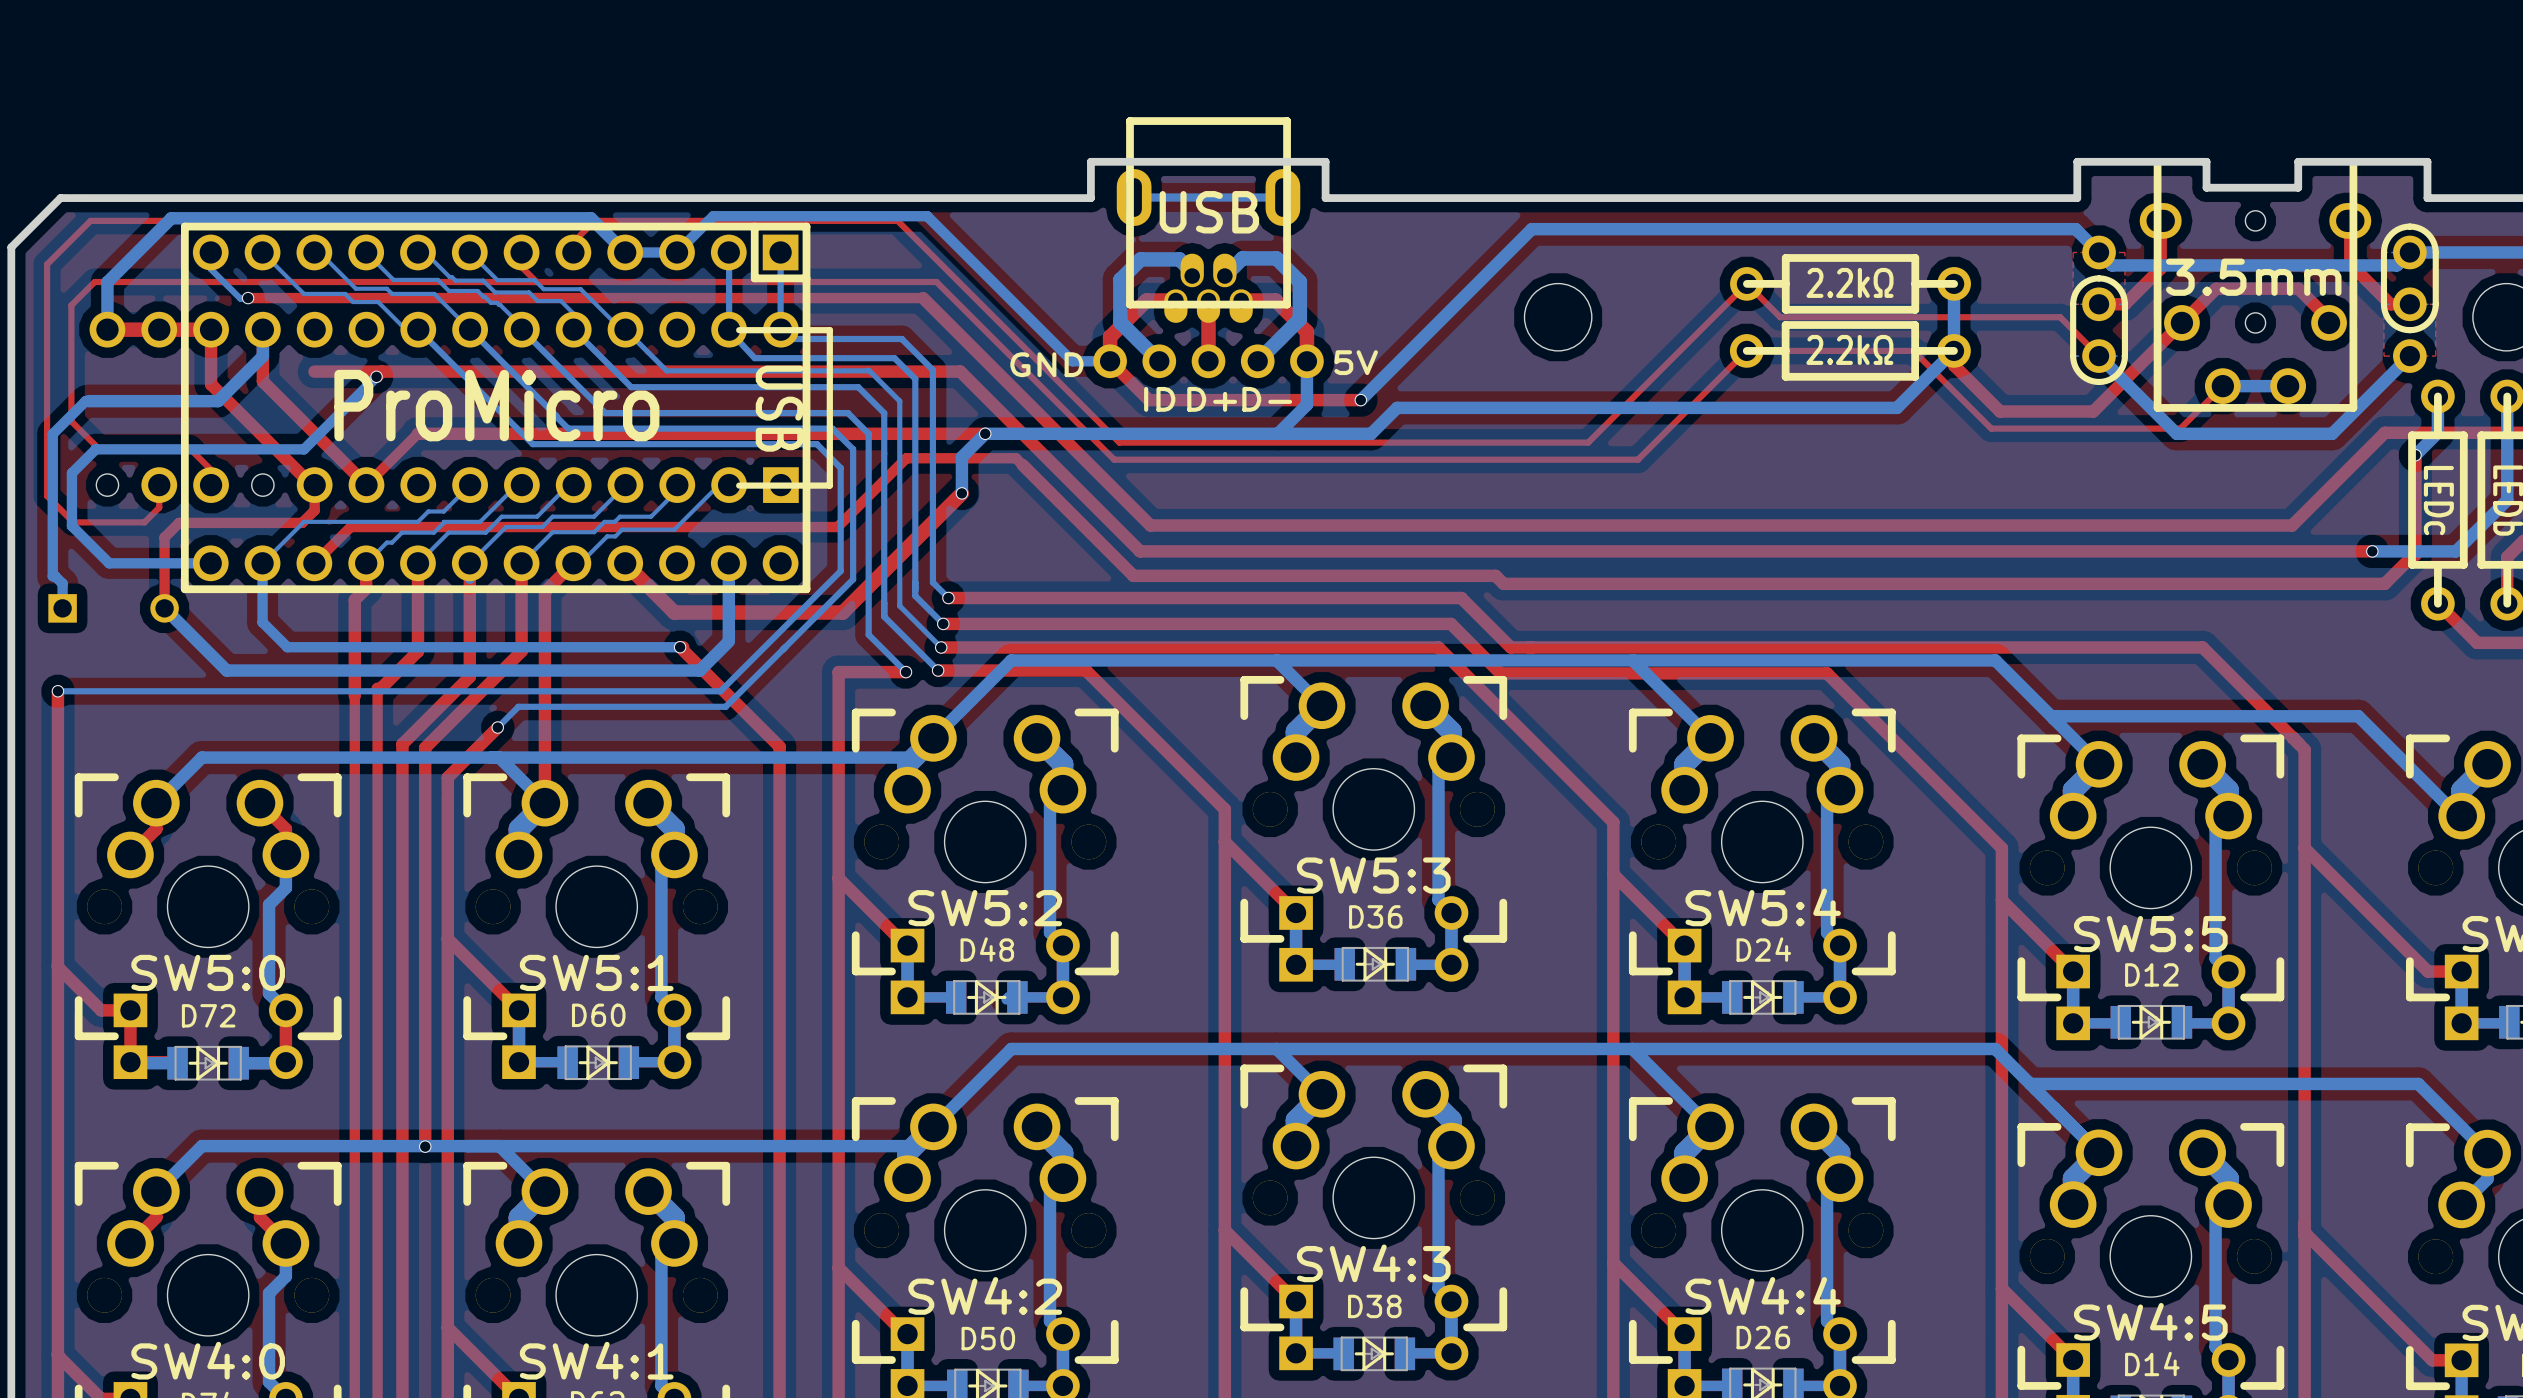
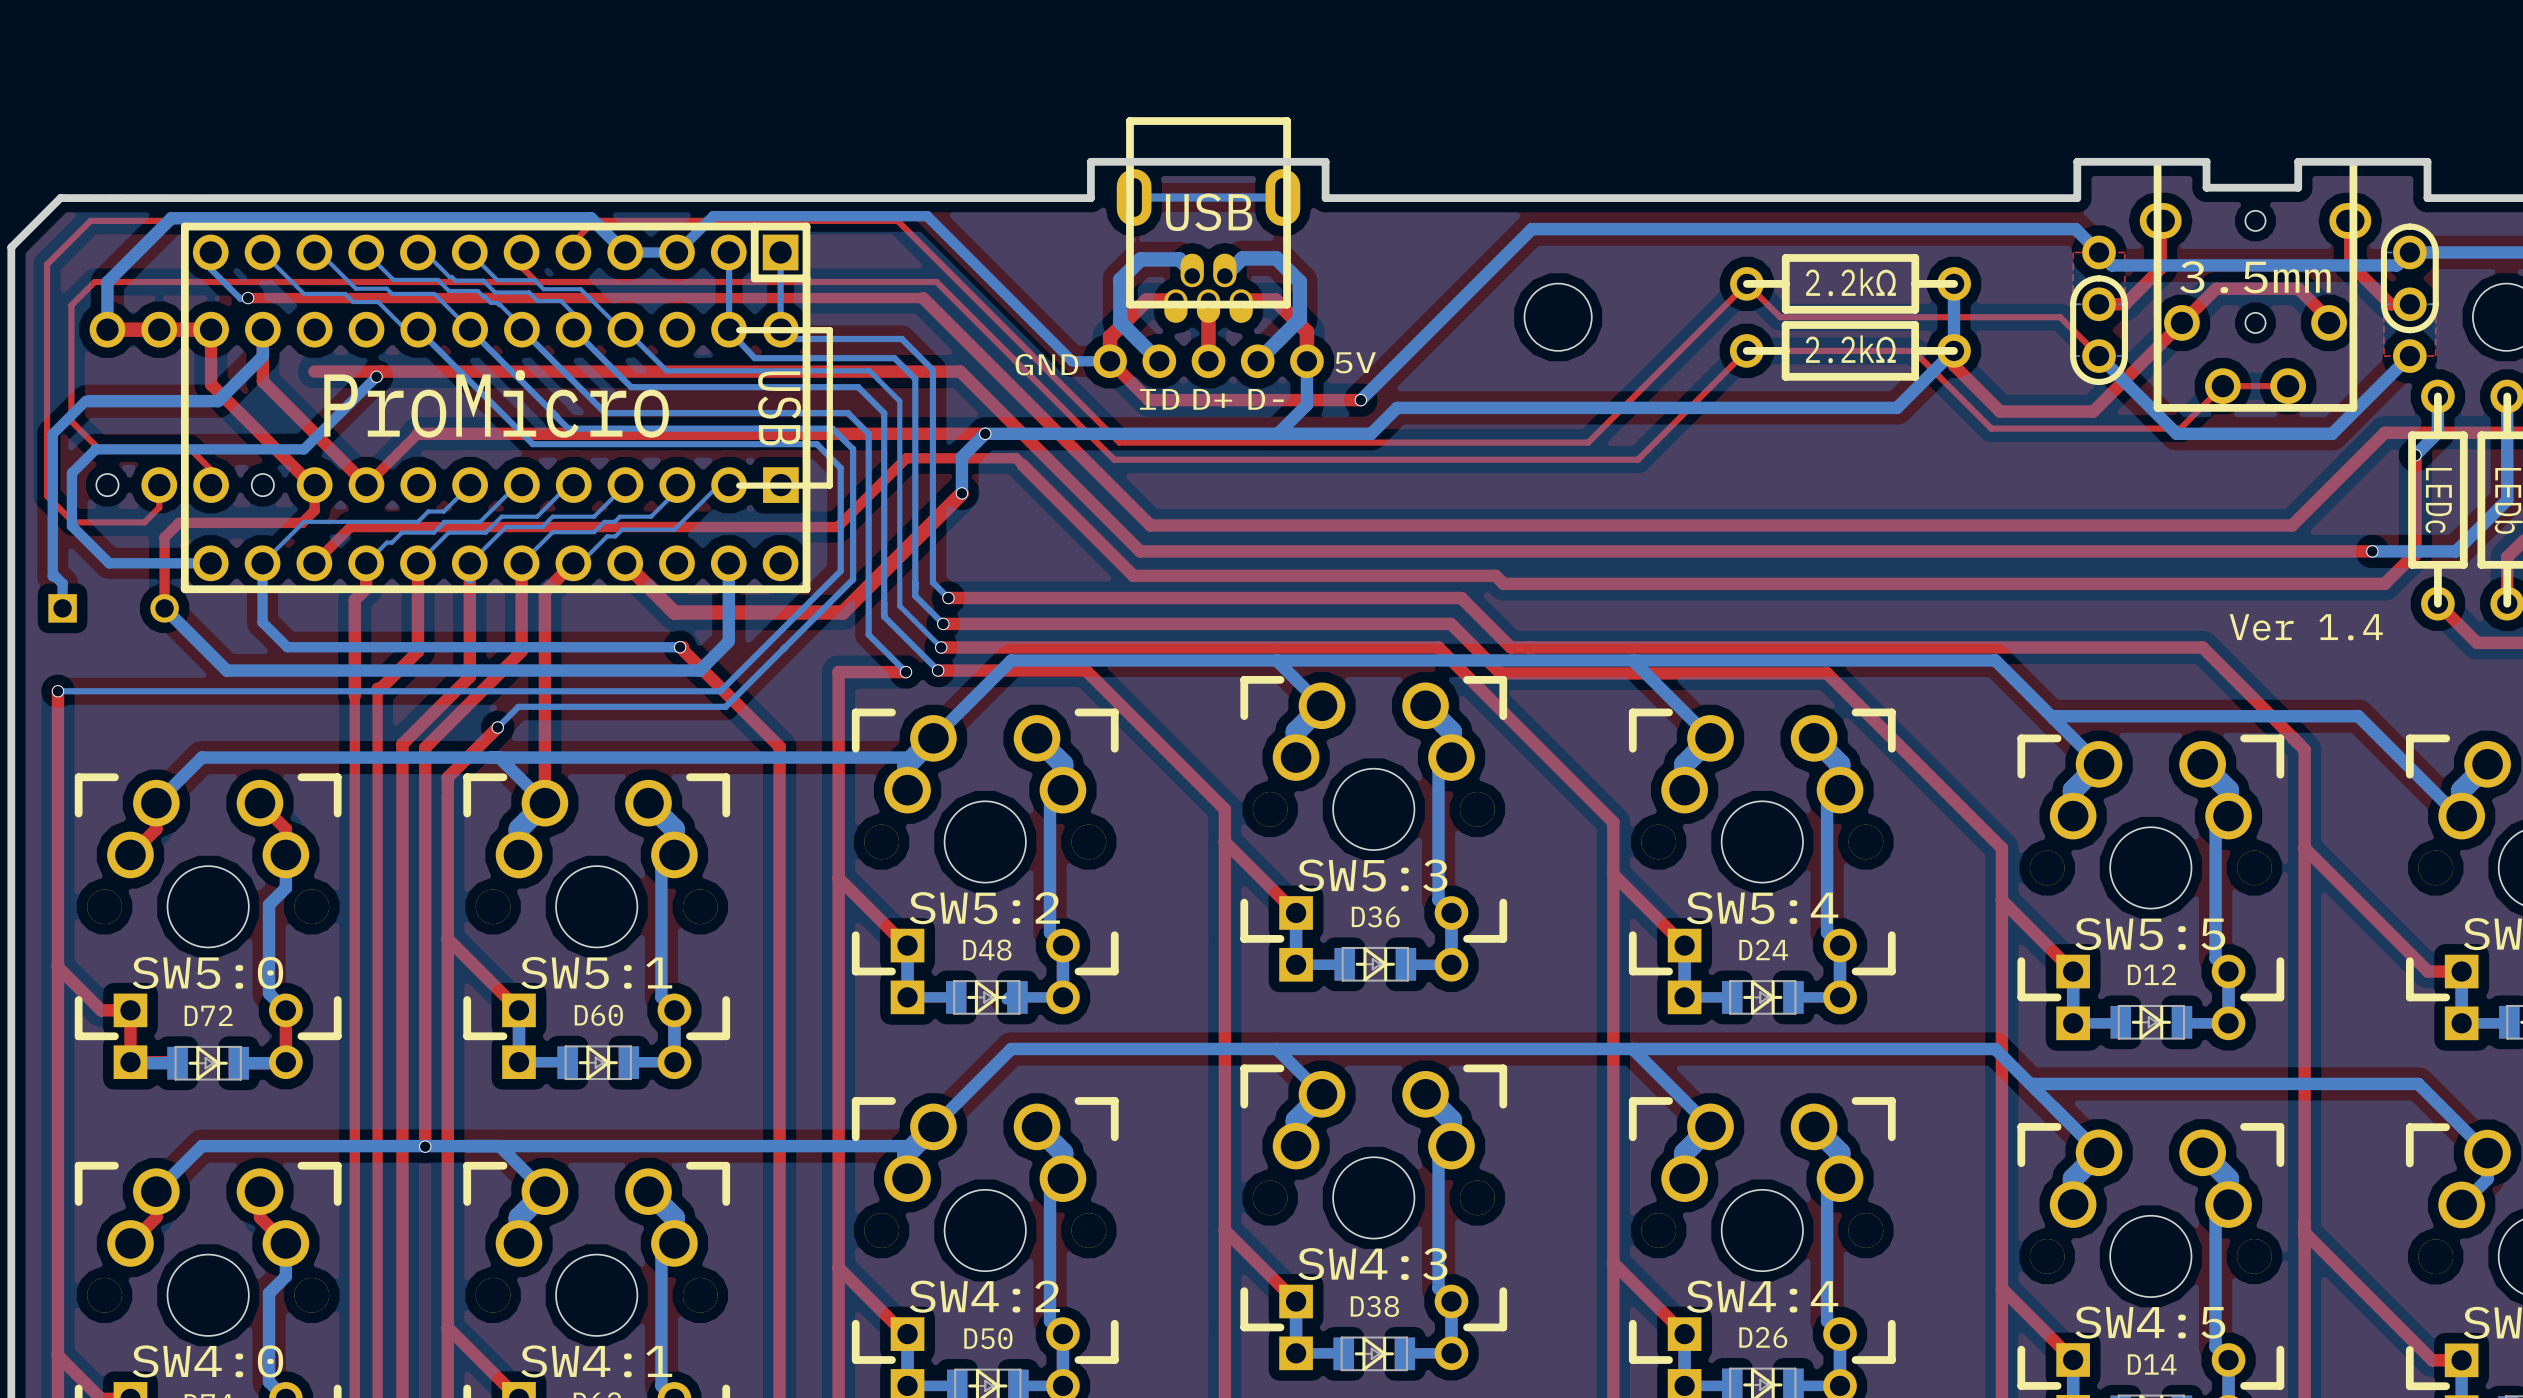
bottom track: (2288, 386) (2222, 386) -> none
top track: none -> (2288, 386) (2222, 386)
text: none -> Ver 1.4 (2306, 627)

